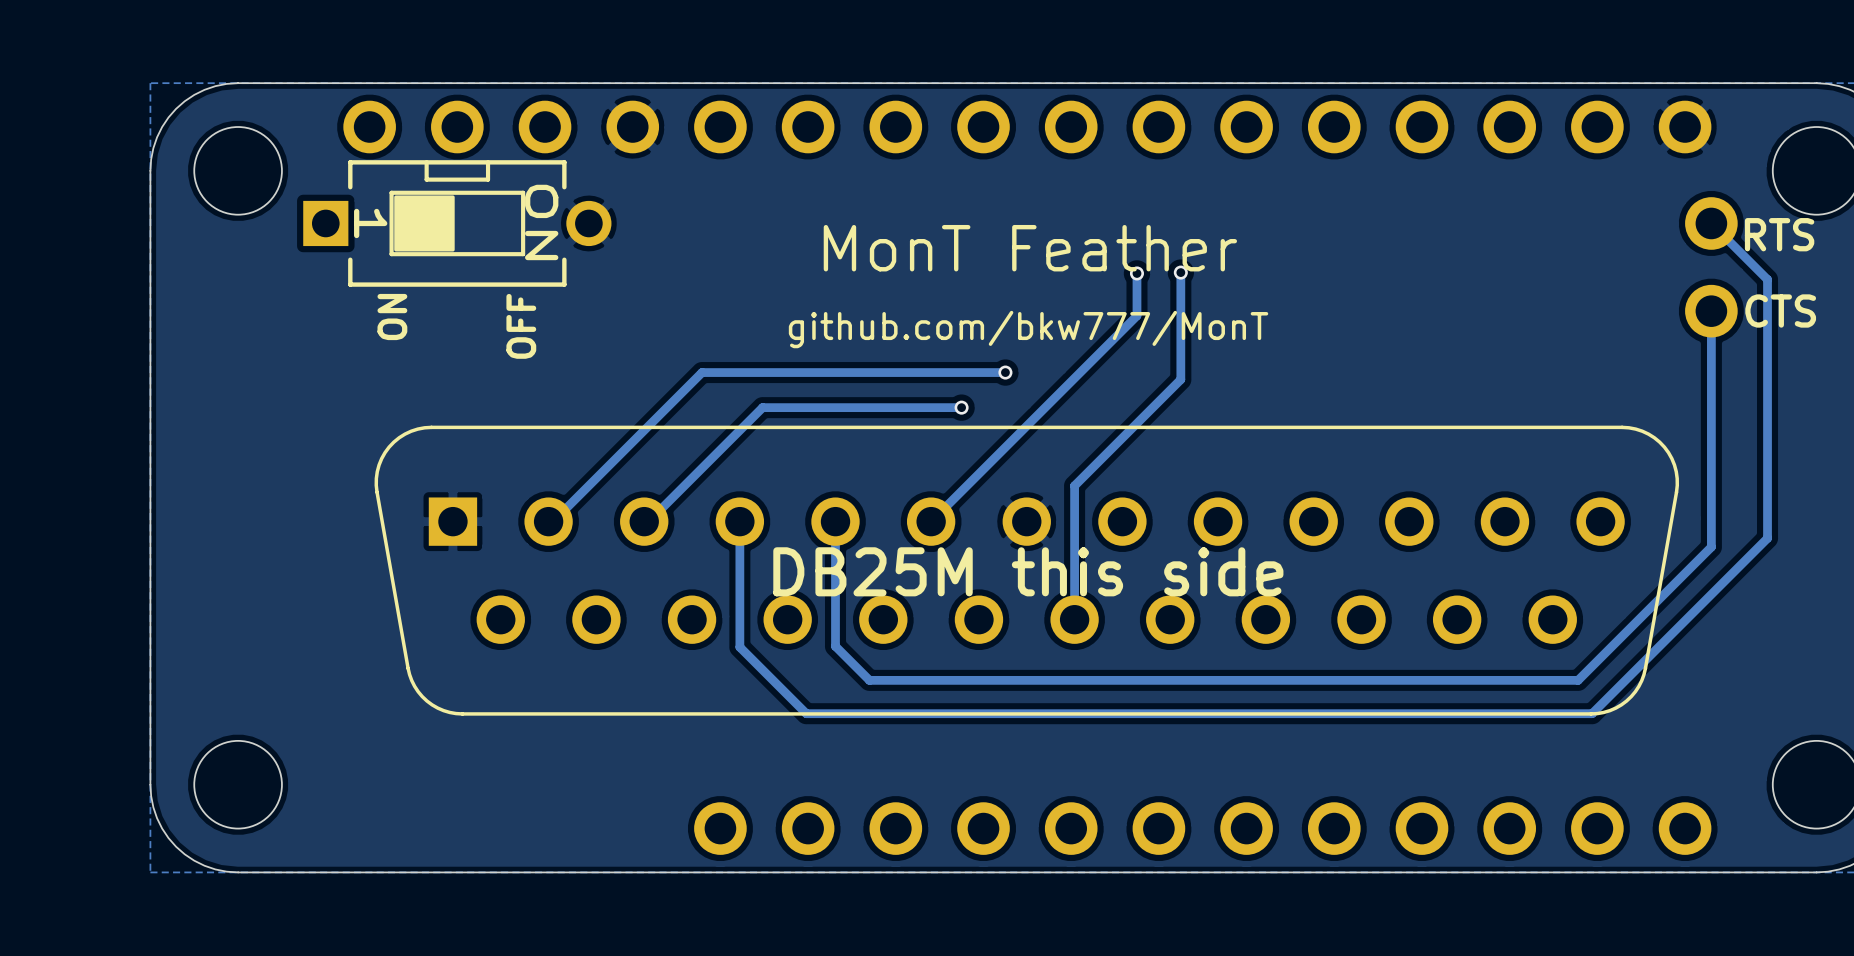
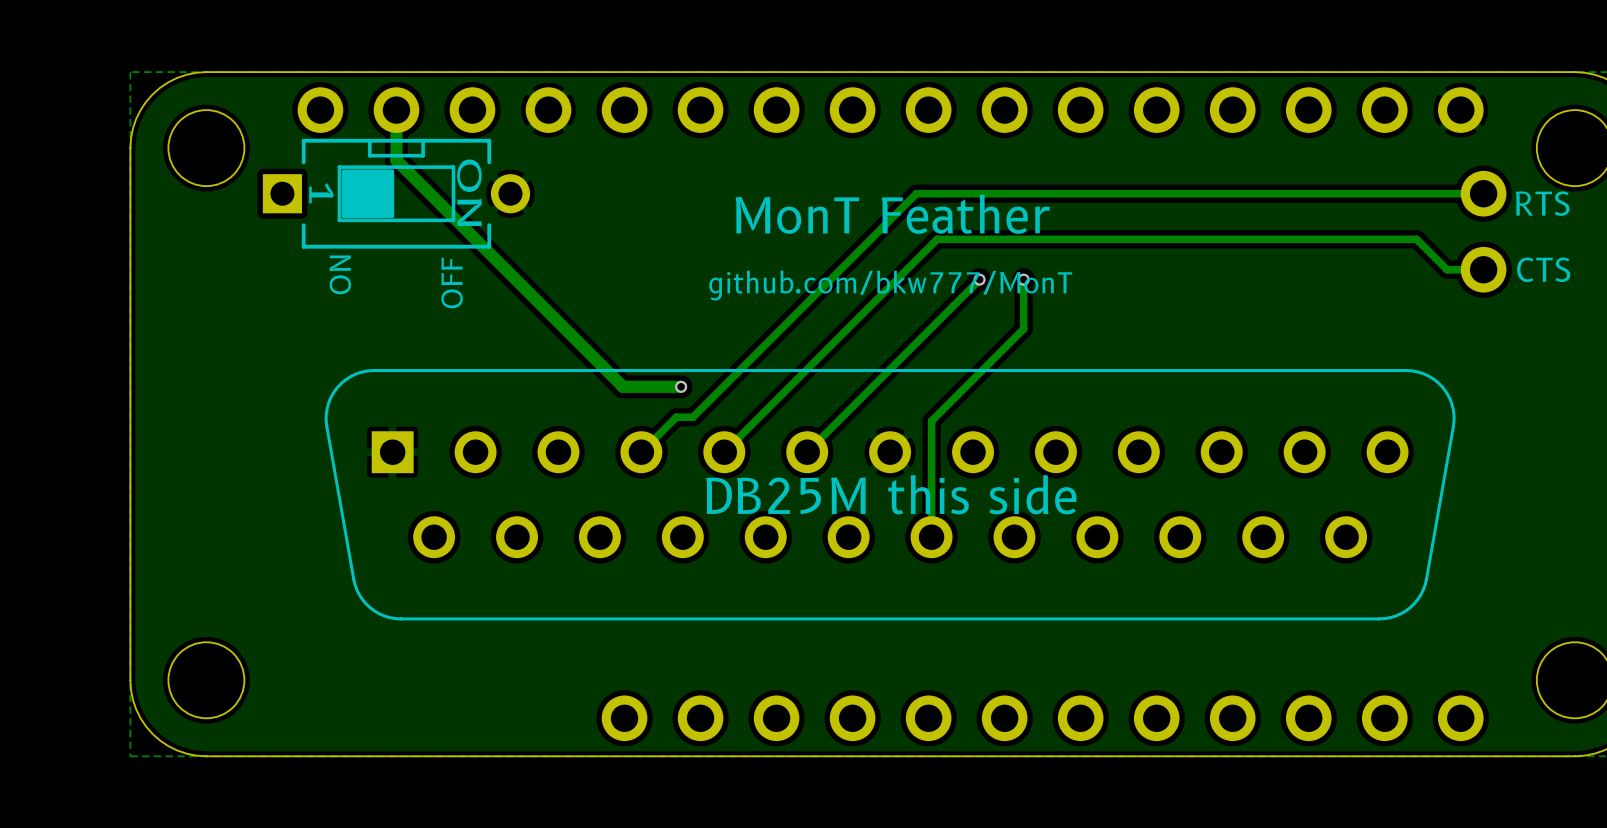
track: none -> (396, 110) (396, 160) (623, 386) (681, 386)
track: (1711, 223) (1767, 279) (1767, 538) (1592, 713) (806, 713) (739, 647) (739, 521) -> (1483, 193) (916, 193) (692, 417) (676, 417) (641, 452)
track: (1180, 272) (1180, 322) -> none
via: (1180, 272) -> none
track: (1136, 273) (1136, 315) (1129, 322) -> none
via: (1136, 273) -> none
track: (1711, 311) (1711, 547) (1578, 680) (869, 680) (835, 646) (835, 521) -> (1483, 269) (1447, 269) (1416, 239) (937, 239) (724, 452)
via: none -> (979, 279)
via: none -> (1023, 279)
track: (1005, 372) (702, 372) (552, 521) -> none
via: (1005, 372) -> none
track: (961, 407) (762, 407) (648, 521) -> none
via: (961, 407) -> none
via: none -> (681, 386)

